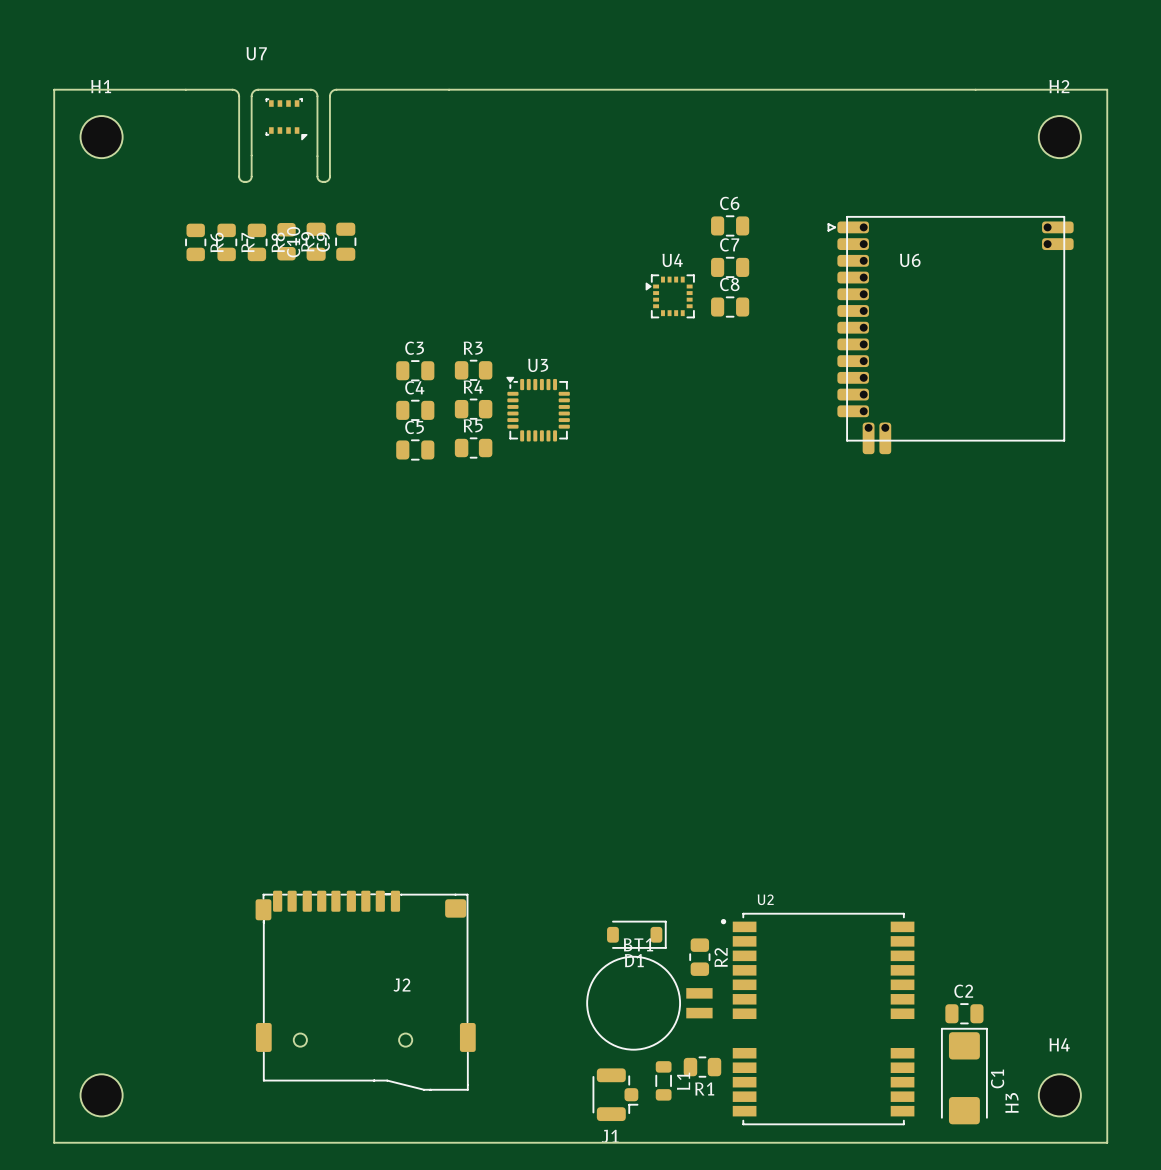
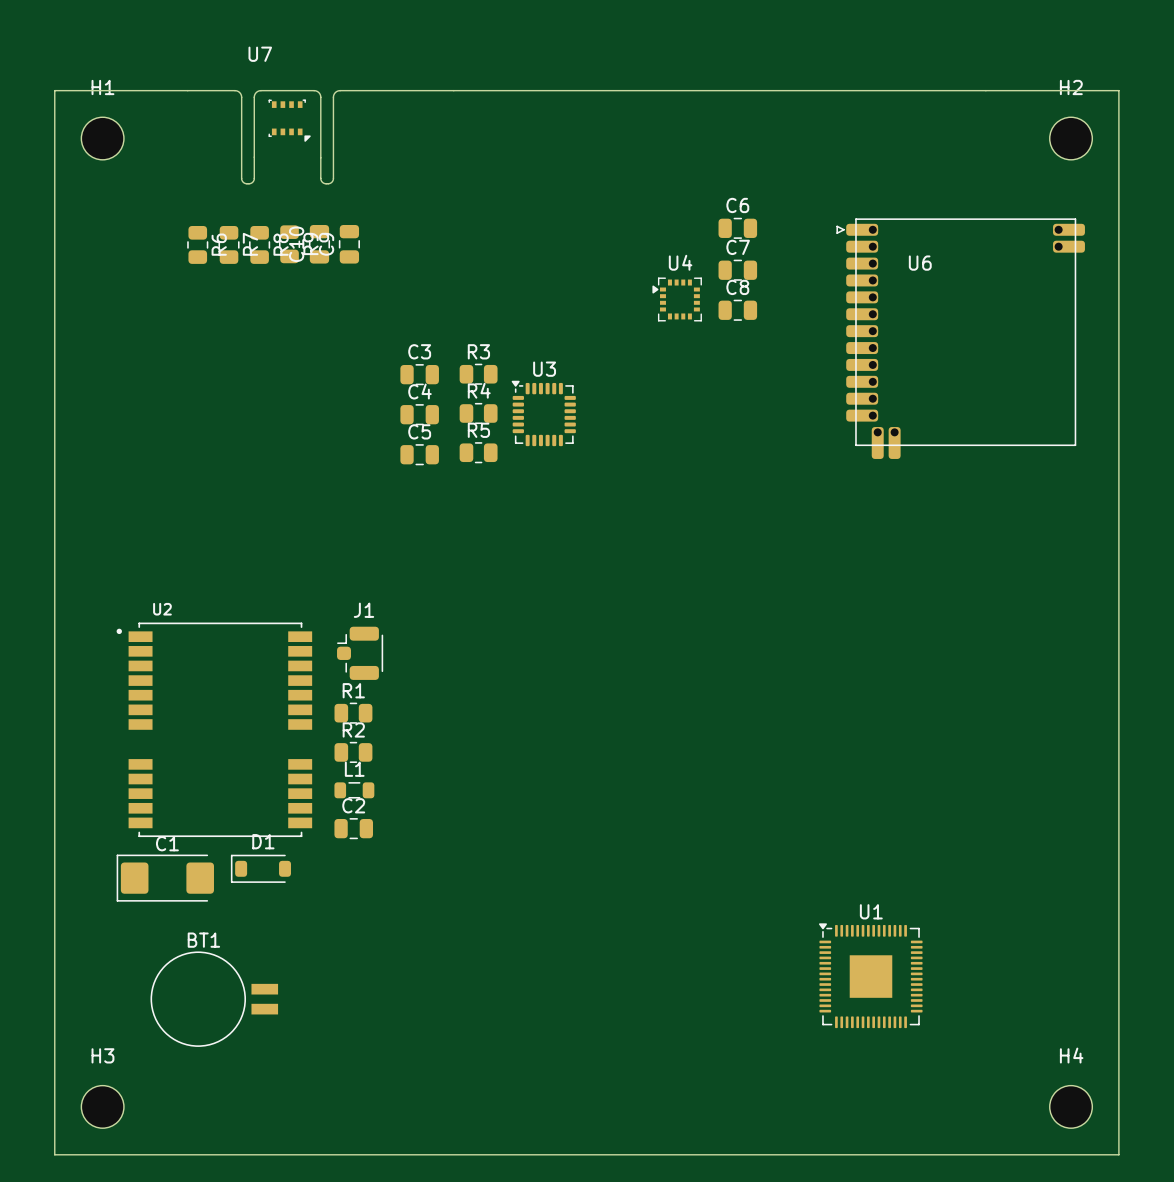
D1 rotation: 0° (636, 934) -> 180° (260, 868)
D1 position: (636, 934) -> (260, 868)
R2 rotation: 0° (699, 957) -> 90° clockwise (353, 752)
R2 position: (699, 957) -> (353, 752)
R2 name position: R2 (721, 957) -> R2 (353, 729)
U1: none -> (870, 975)
J2: (365, 990) -> none
BT1 position: (649, 1003) -> (214, 999)
C2 position: (964, 1013) -> (353, 828)
U2 position: (817, 1019) -> (214, 729)
R1 position: (702, 1067) -> (353, 713)
C1 rotation: 0° (964, 1076) -> 90° counterclockwise (165, 878)
C1 position: (964, 1076) -> (165, 878)
L1 rotation: 0° (663, 1080) -> 90° clockwise (354, 790)
L1 position: (663, 1080) -> (354, 790)
L1 name position: L1 (683, 1081) -> L1 (354, 769)
R1 name position: R1 (704, 1088) -> R1 (353, 690)
J1 rotation: 0° (615, 1094) -> 180° (360, 653)
J1 position: (615, 1094) -> (360, 653)
H3 name rotation: 0° (1011, 1103) -> 90° clockwise (102, 1055)
H3 name position: H3 (1011, 1103) -> H3 (102, 1055)

